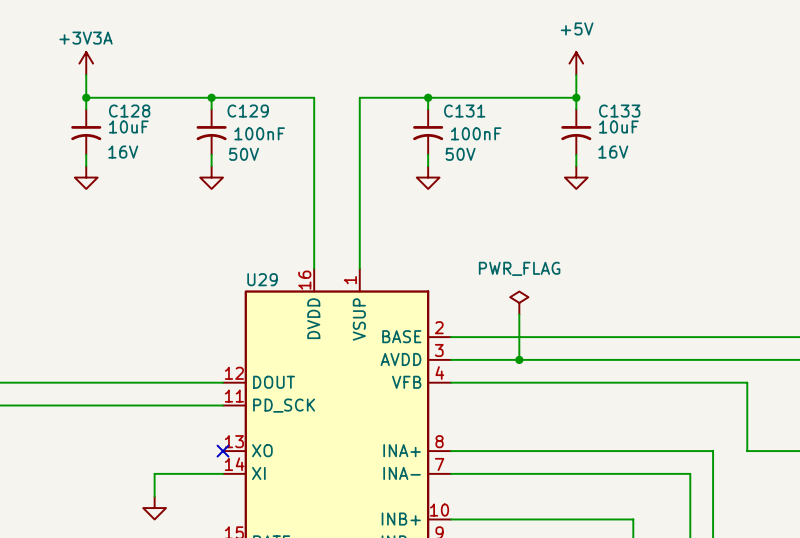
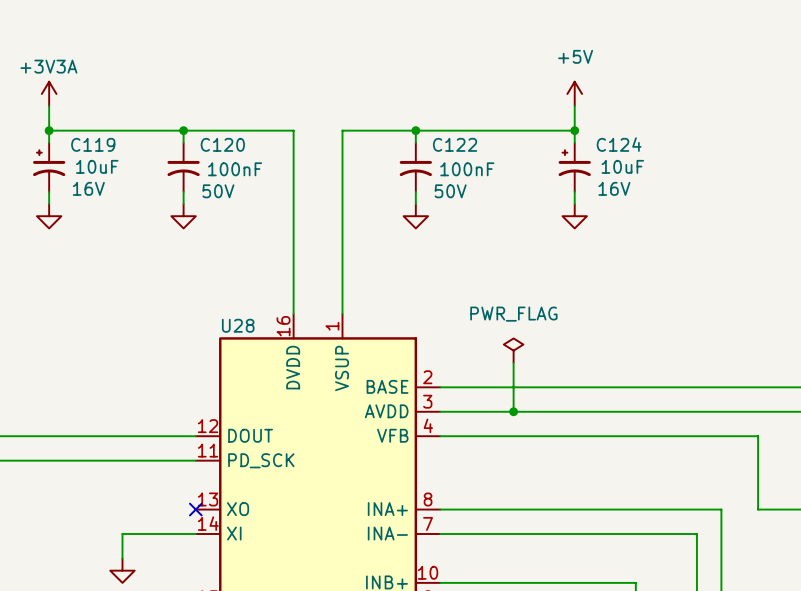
C129 name: C129 (248, 111) -> C120 (222, 144)
C131 name: C131 (464, 111) -> C122 (455, 144)
C128: 10uF (86, 131) -> none
C119: none -> 10uF (49, 167)
C133: 10uF (576, 131) -> none
C124: none -> 10uF (574, 167)
U29 name: U29 (262, 279) -> U28 (238, 325)

